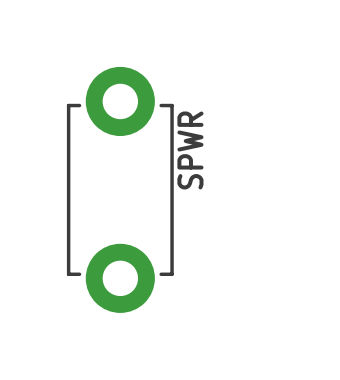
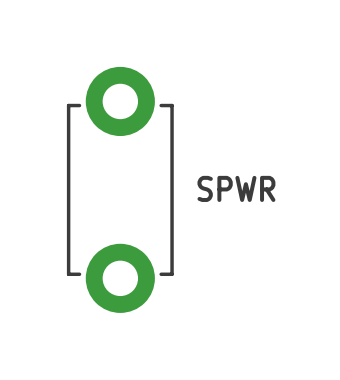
SPWR name rotation: 0° (190, 150) -> 90° clockwise (236, 188)

